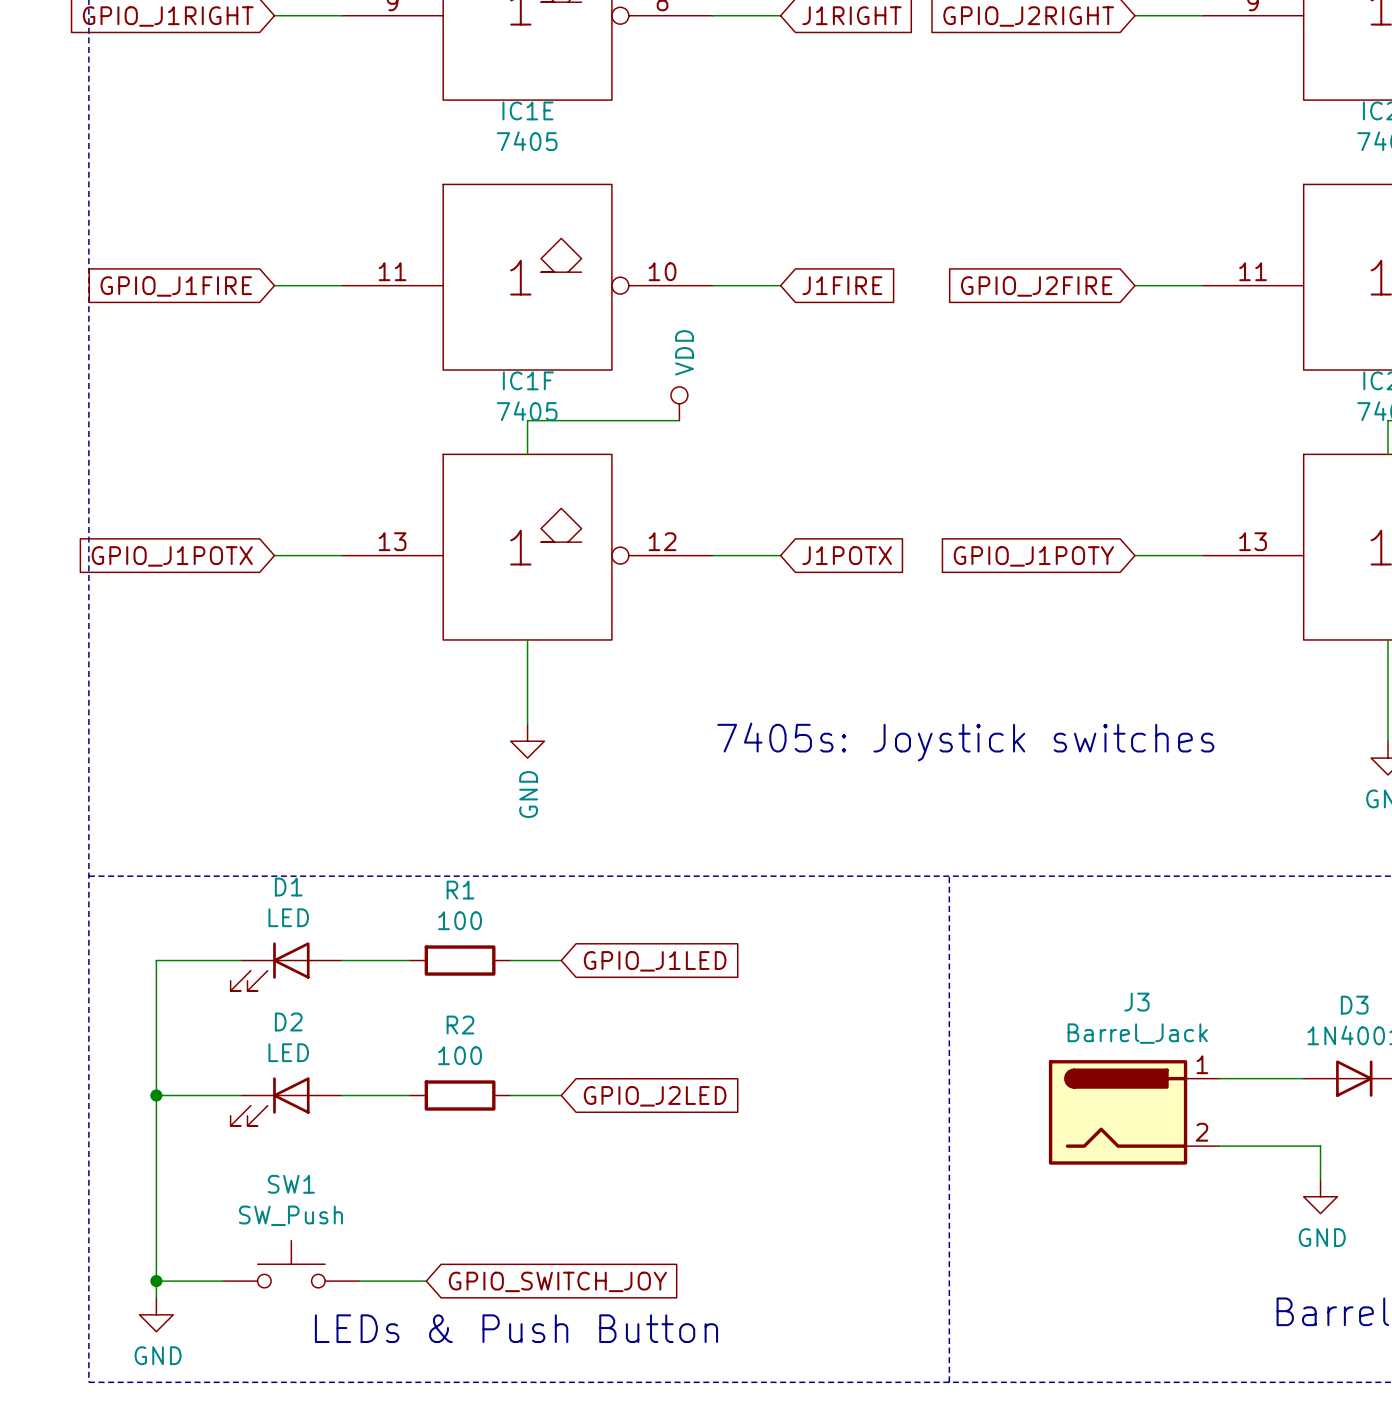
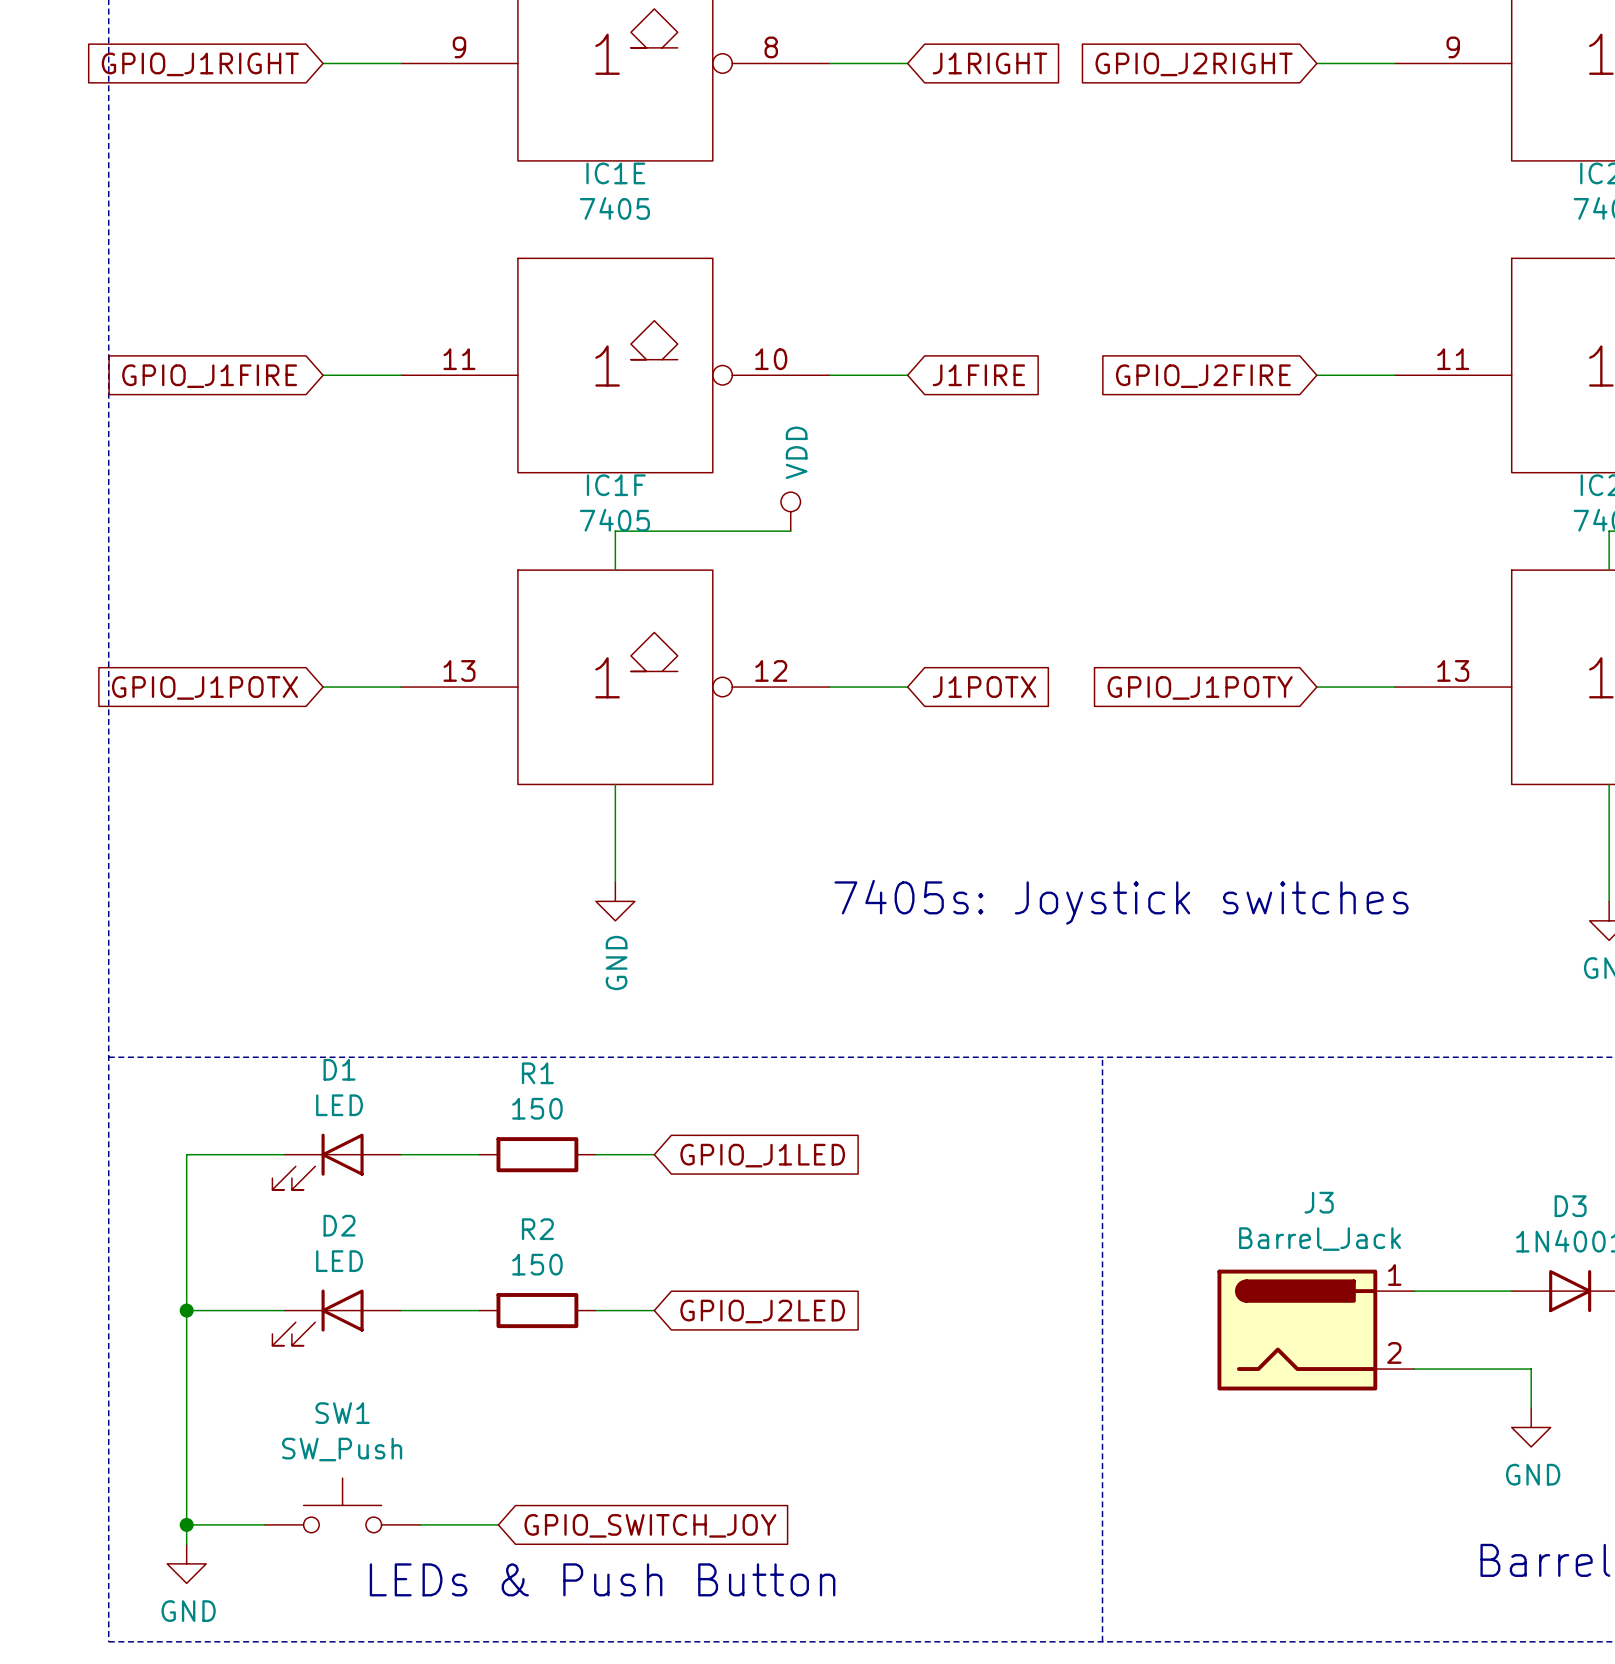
R1 value: 100 (460, 920) -> 150 (537, 1108)
R2 value: 100 (460, 1055) -> 150 (537, 1264)

